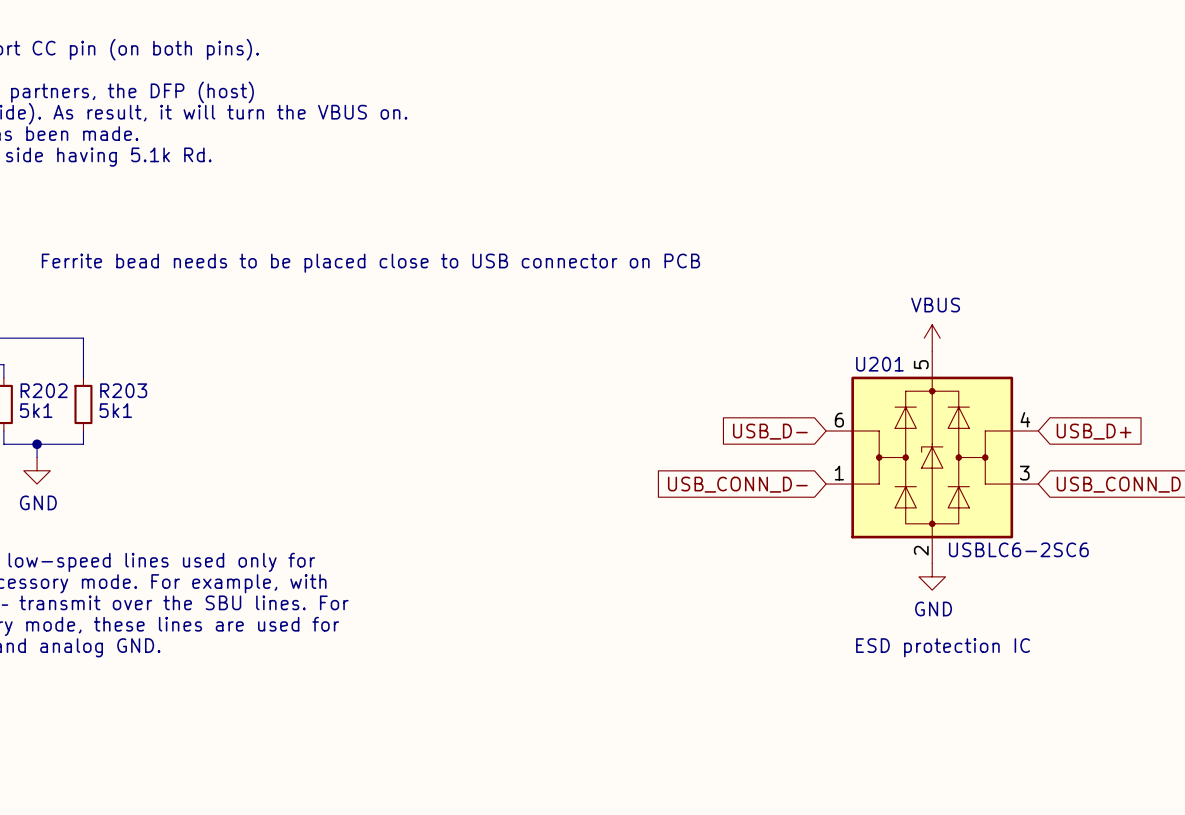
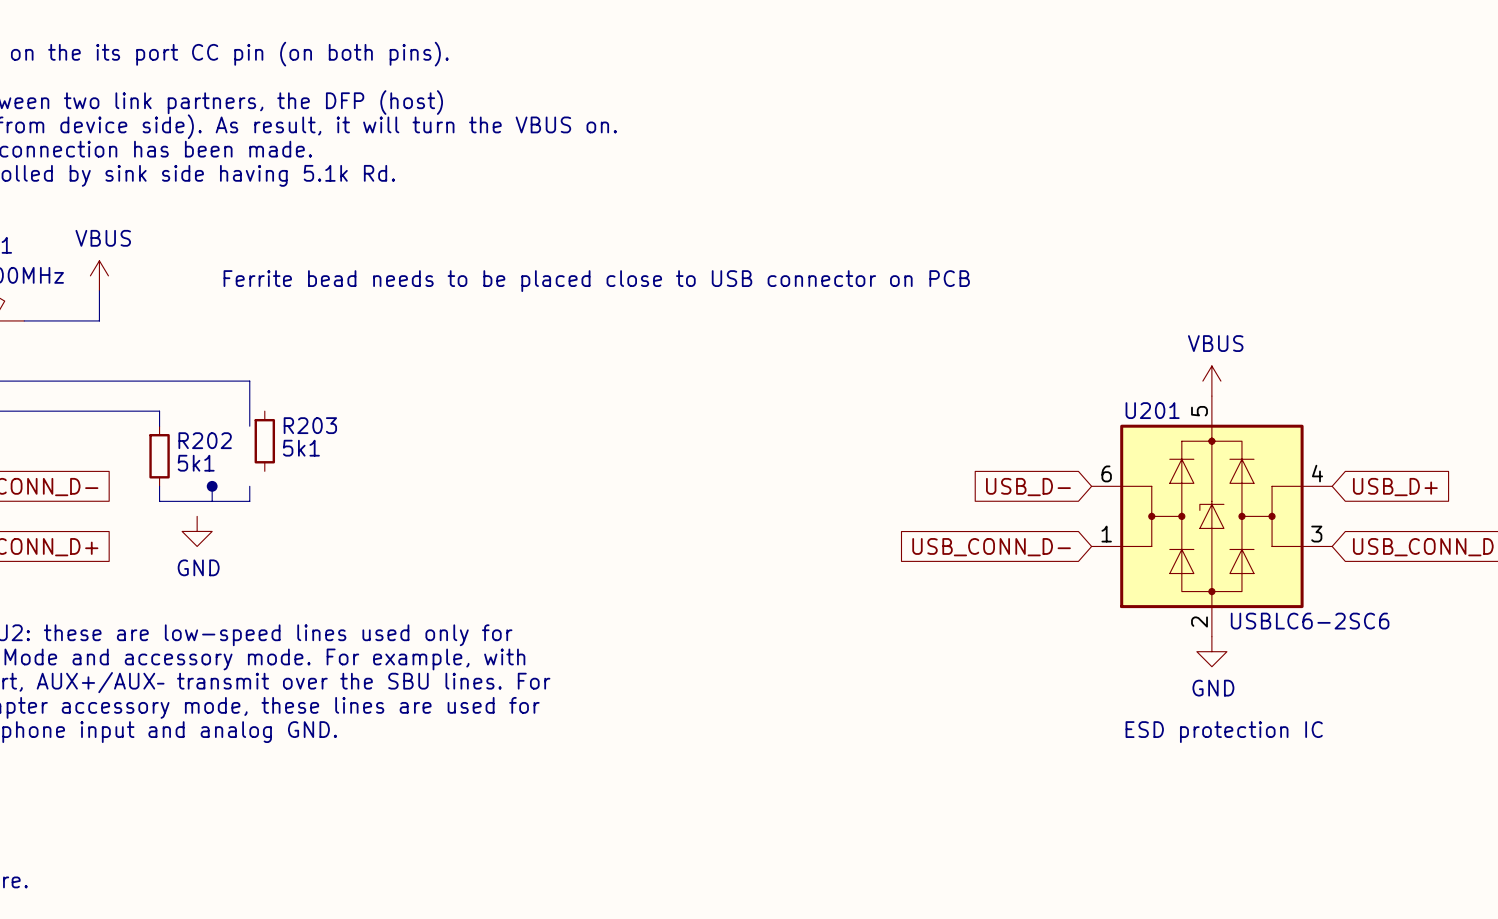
text position: Ferrite bead needs to be placed close to USB connector on PCB (370, 263) -> Ferrite bead needs to be placed close to USB connector on PCB (596, 281)
R203 position: (83, 404) -> (264, 441)
wire: (37, 444) (37, 457) -> (212, 486) (212, 501)
junction position: (37, 444) -> (212, 486)

